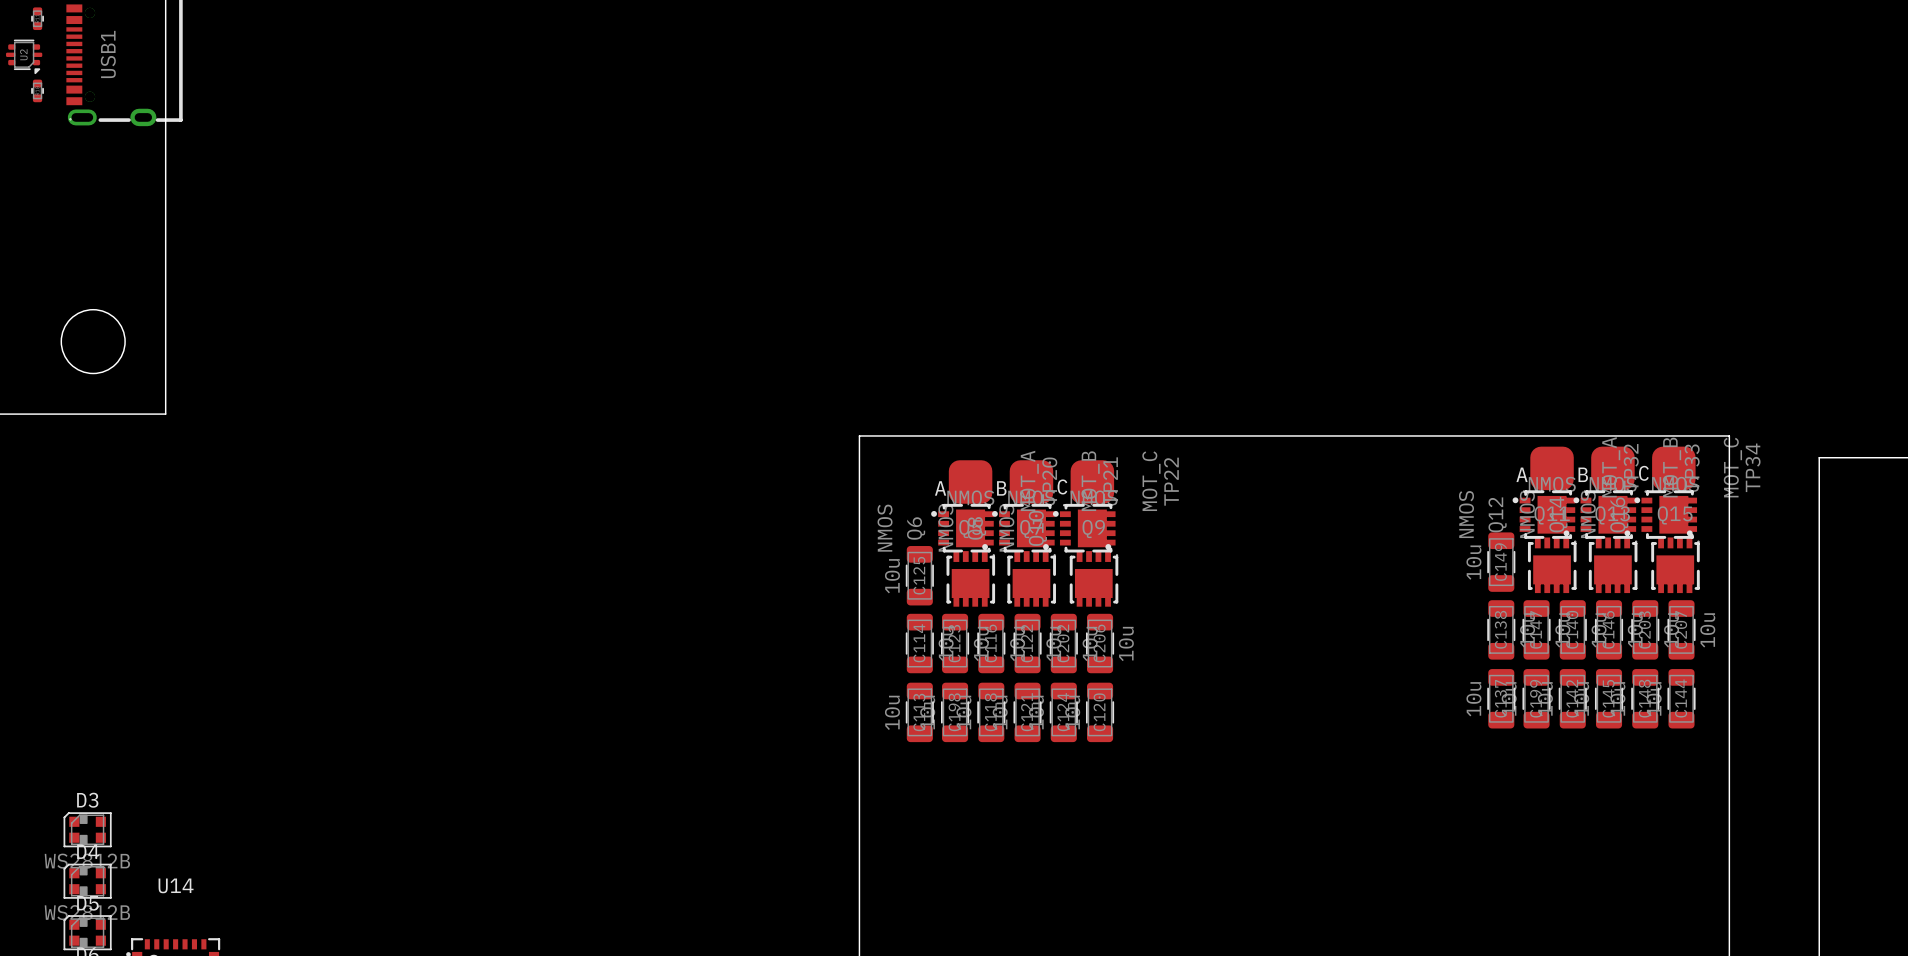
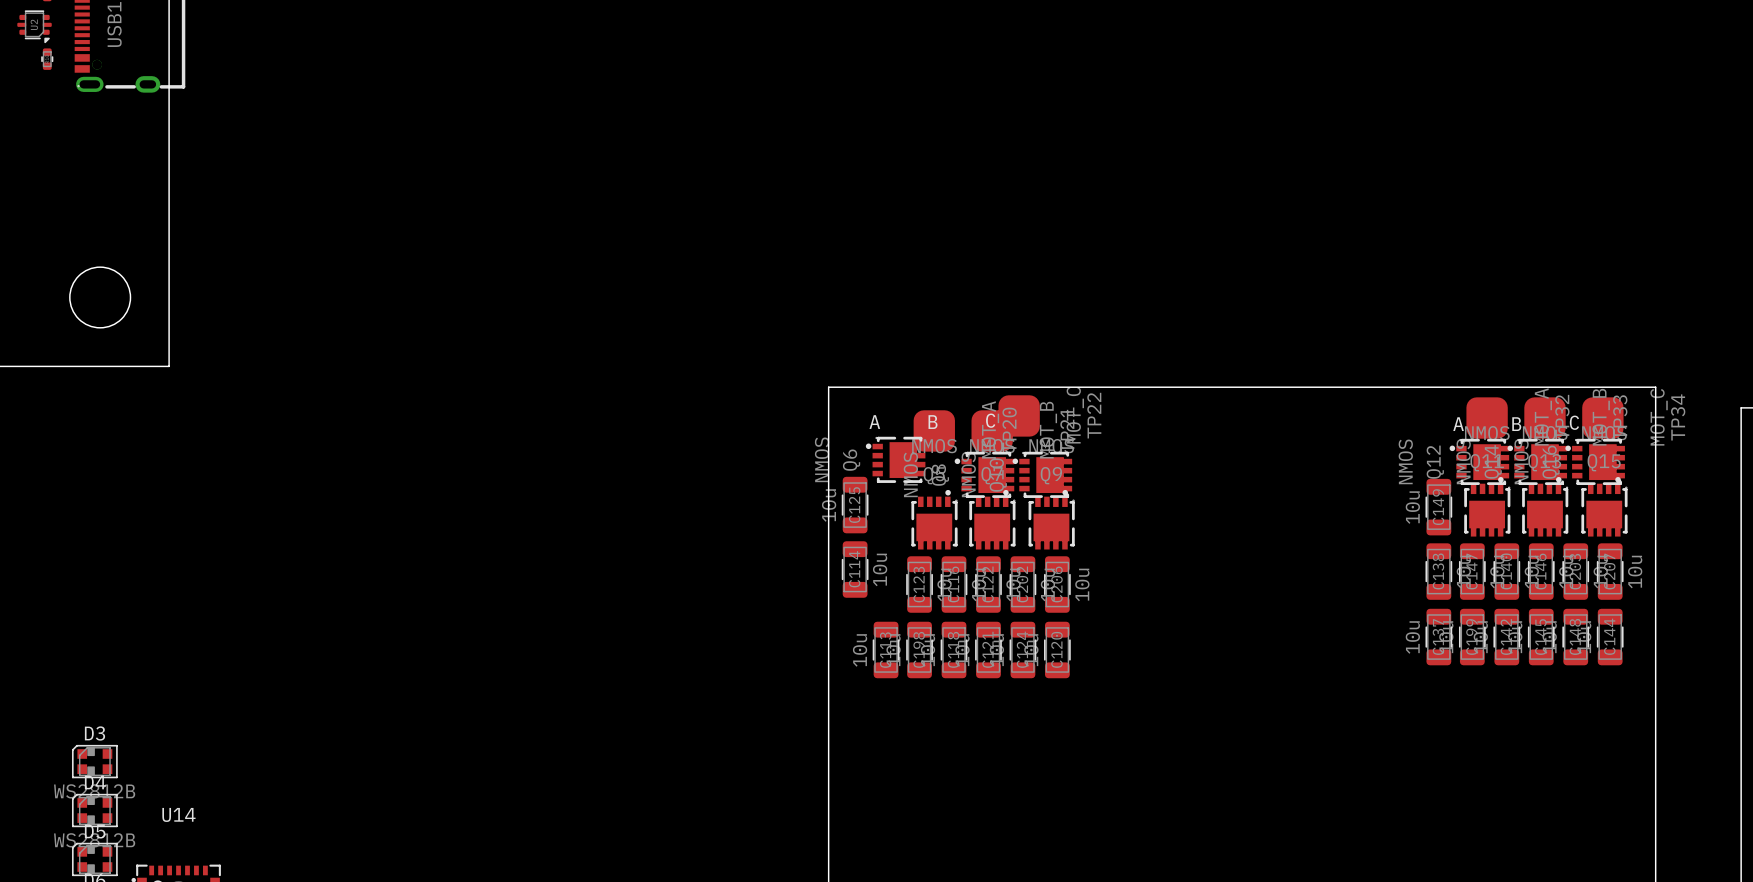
TP22 position: (1092, 482) -> (1019, 415)
text position: C (1062, 486) -> C (990, 420)
text position: A (940, 488) -> A (874, 422)
text position: B (1001, 488) -> B (933, 422)
Q6 position: (962, 528) -> (895, 459)
C125 position: (919, 575) -> (855, 505)
C114 position: (919, 643) -> (855, 569)

